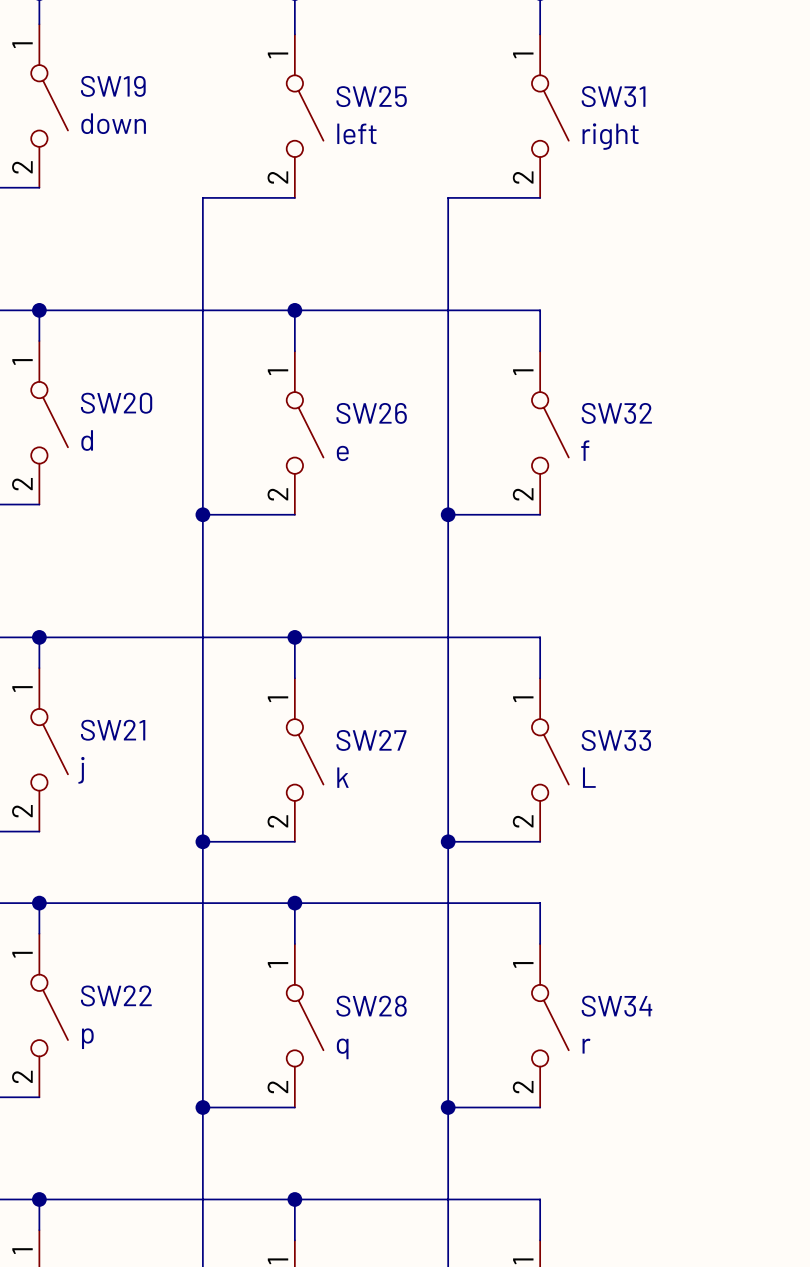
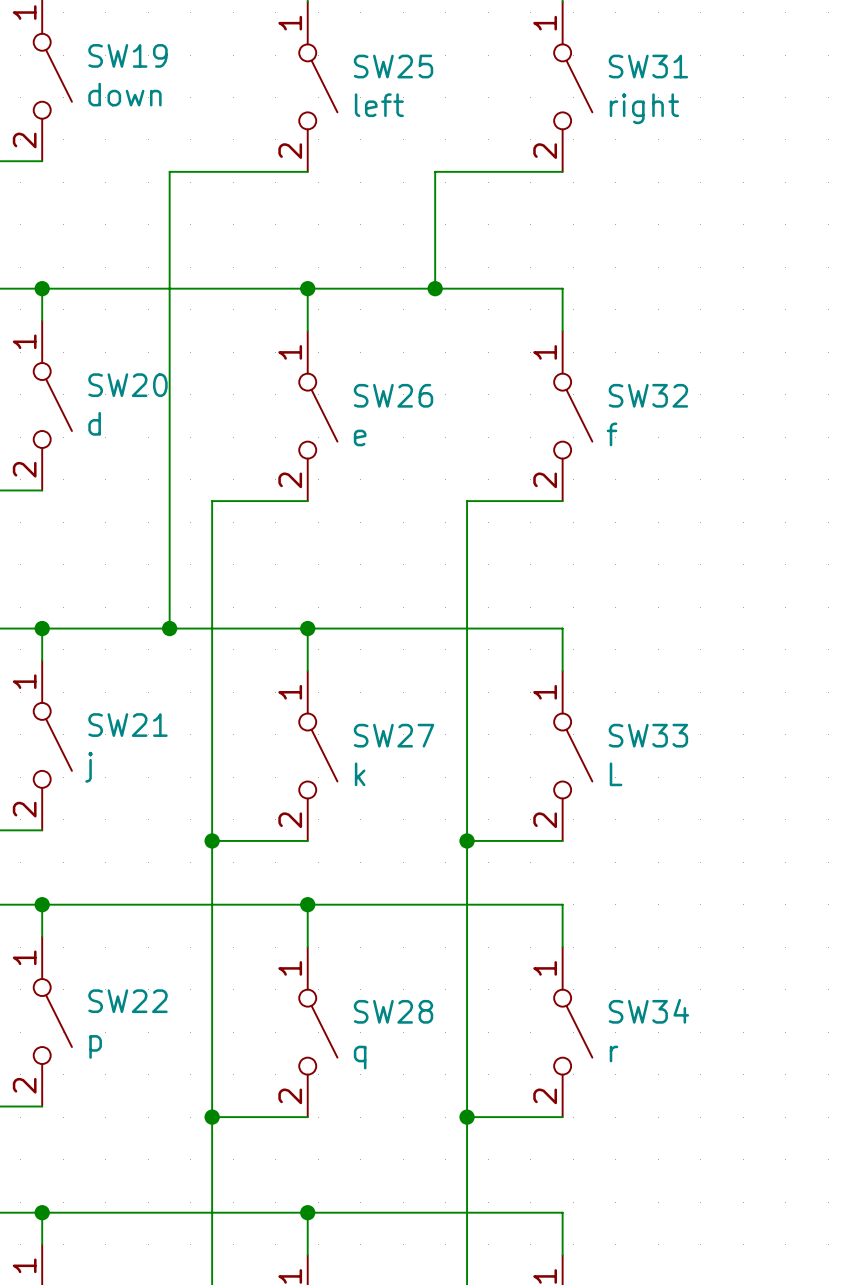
wire: (202, 197) (202, 514) -> (212, 171) (169, 171) (169, 628)
wire: (448, 197) (448, 514) -> (467, 171) (435, 171) (435, 288)
junction: none -> (435, 288)
junction: (202, 514) -> none
junction: (448, 514) -> none
junction: none -> (169, 628)

